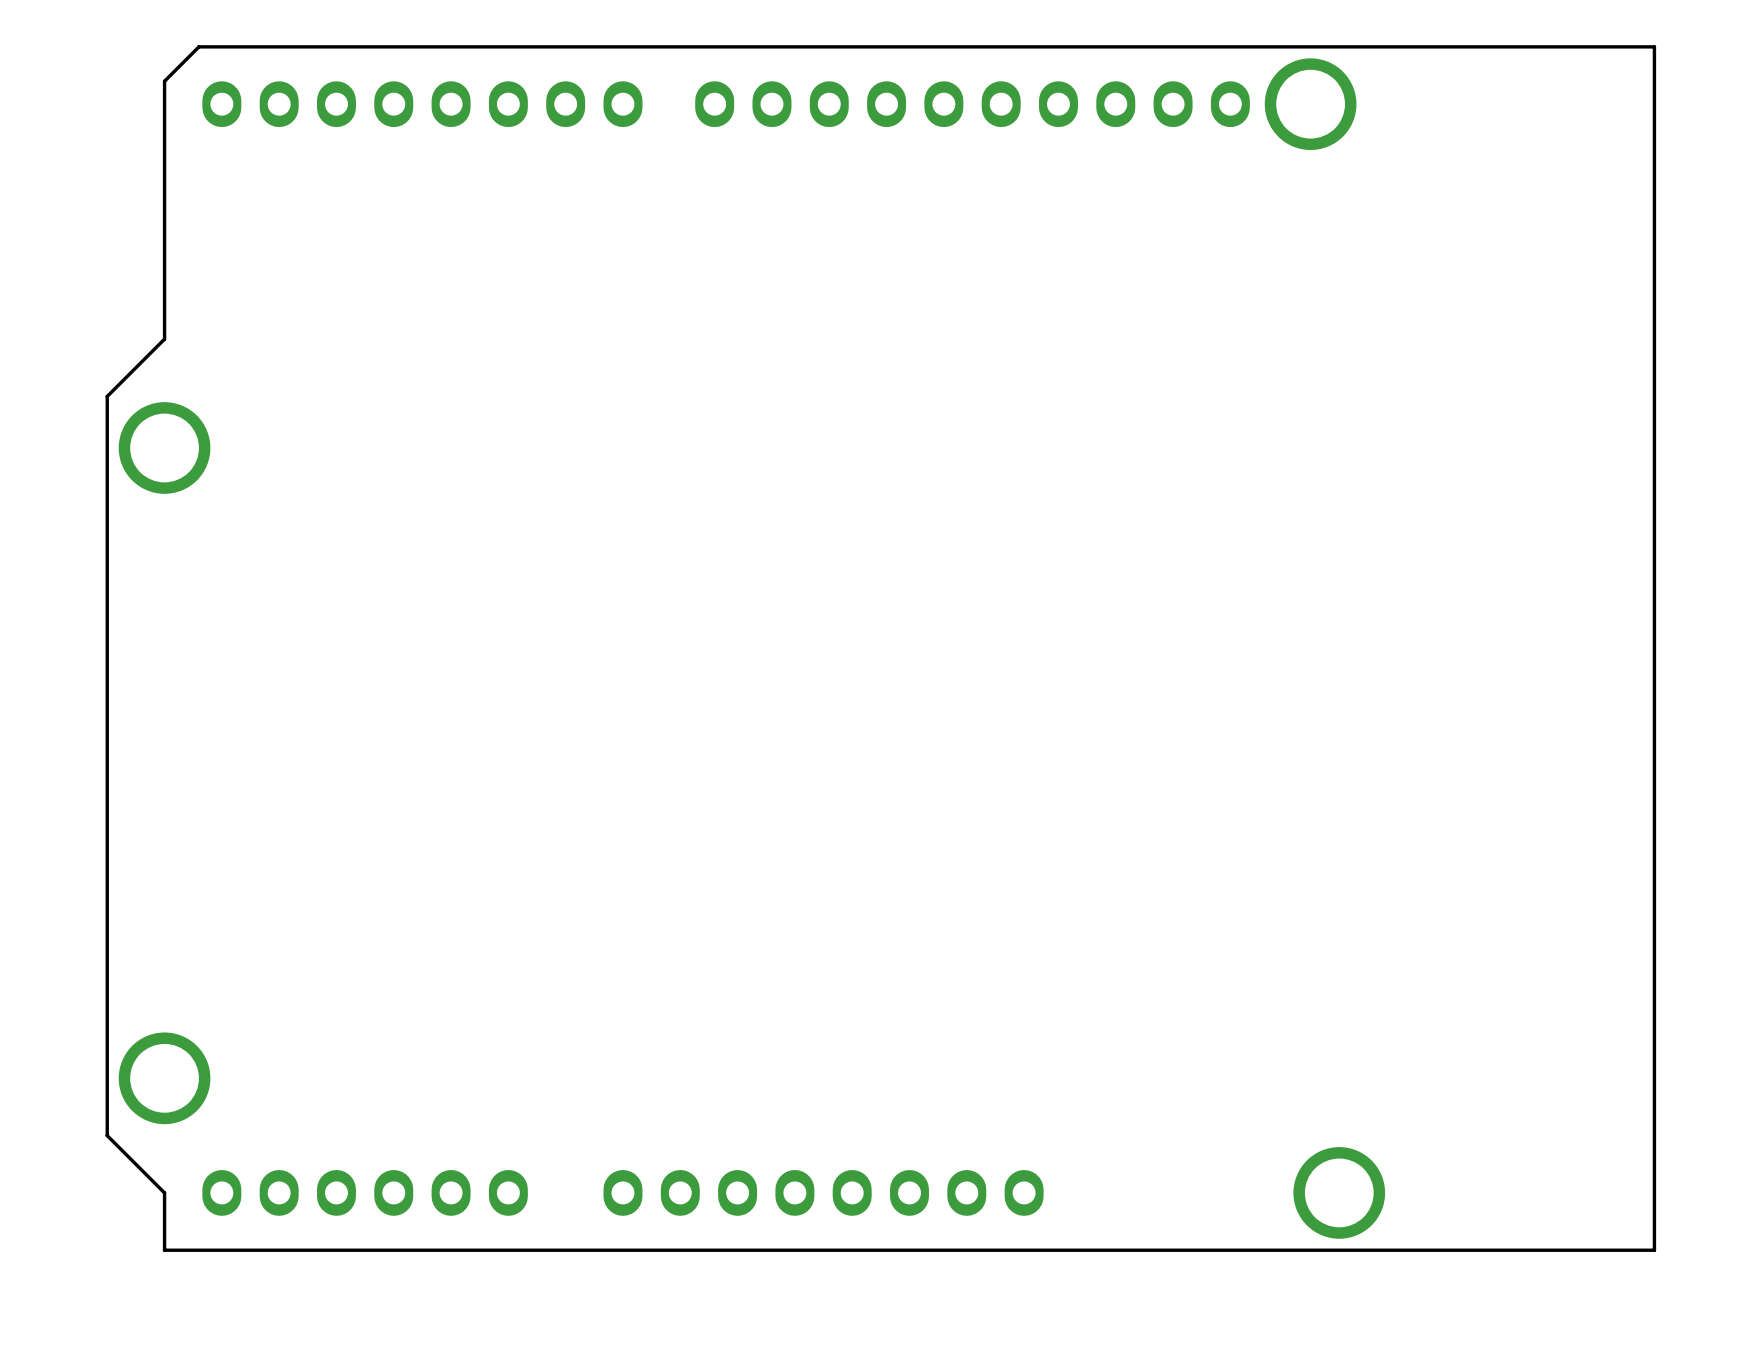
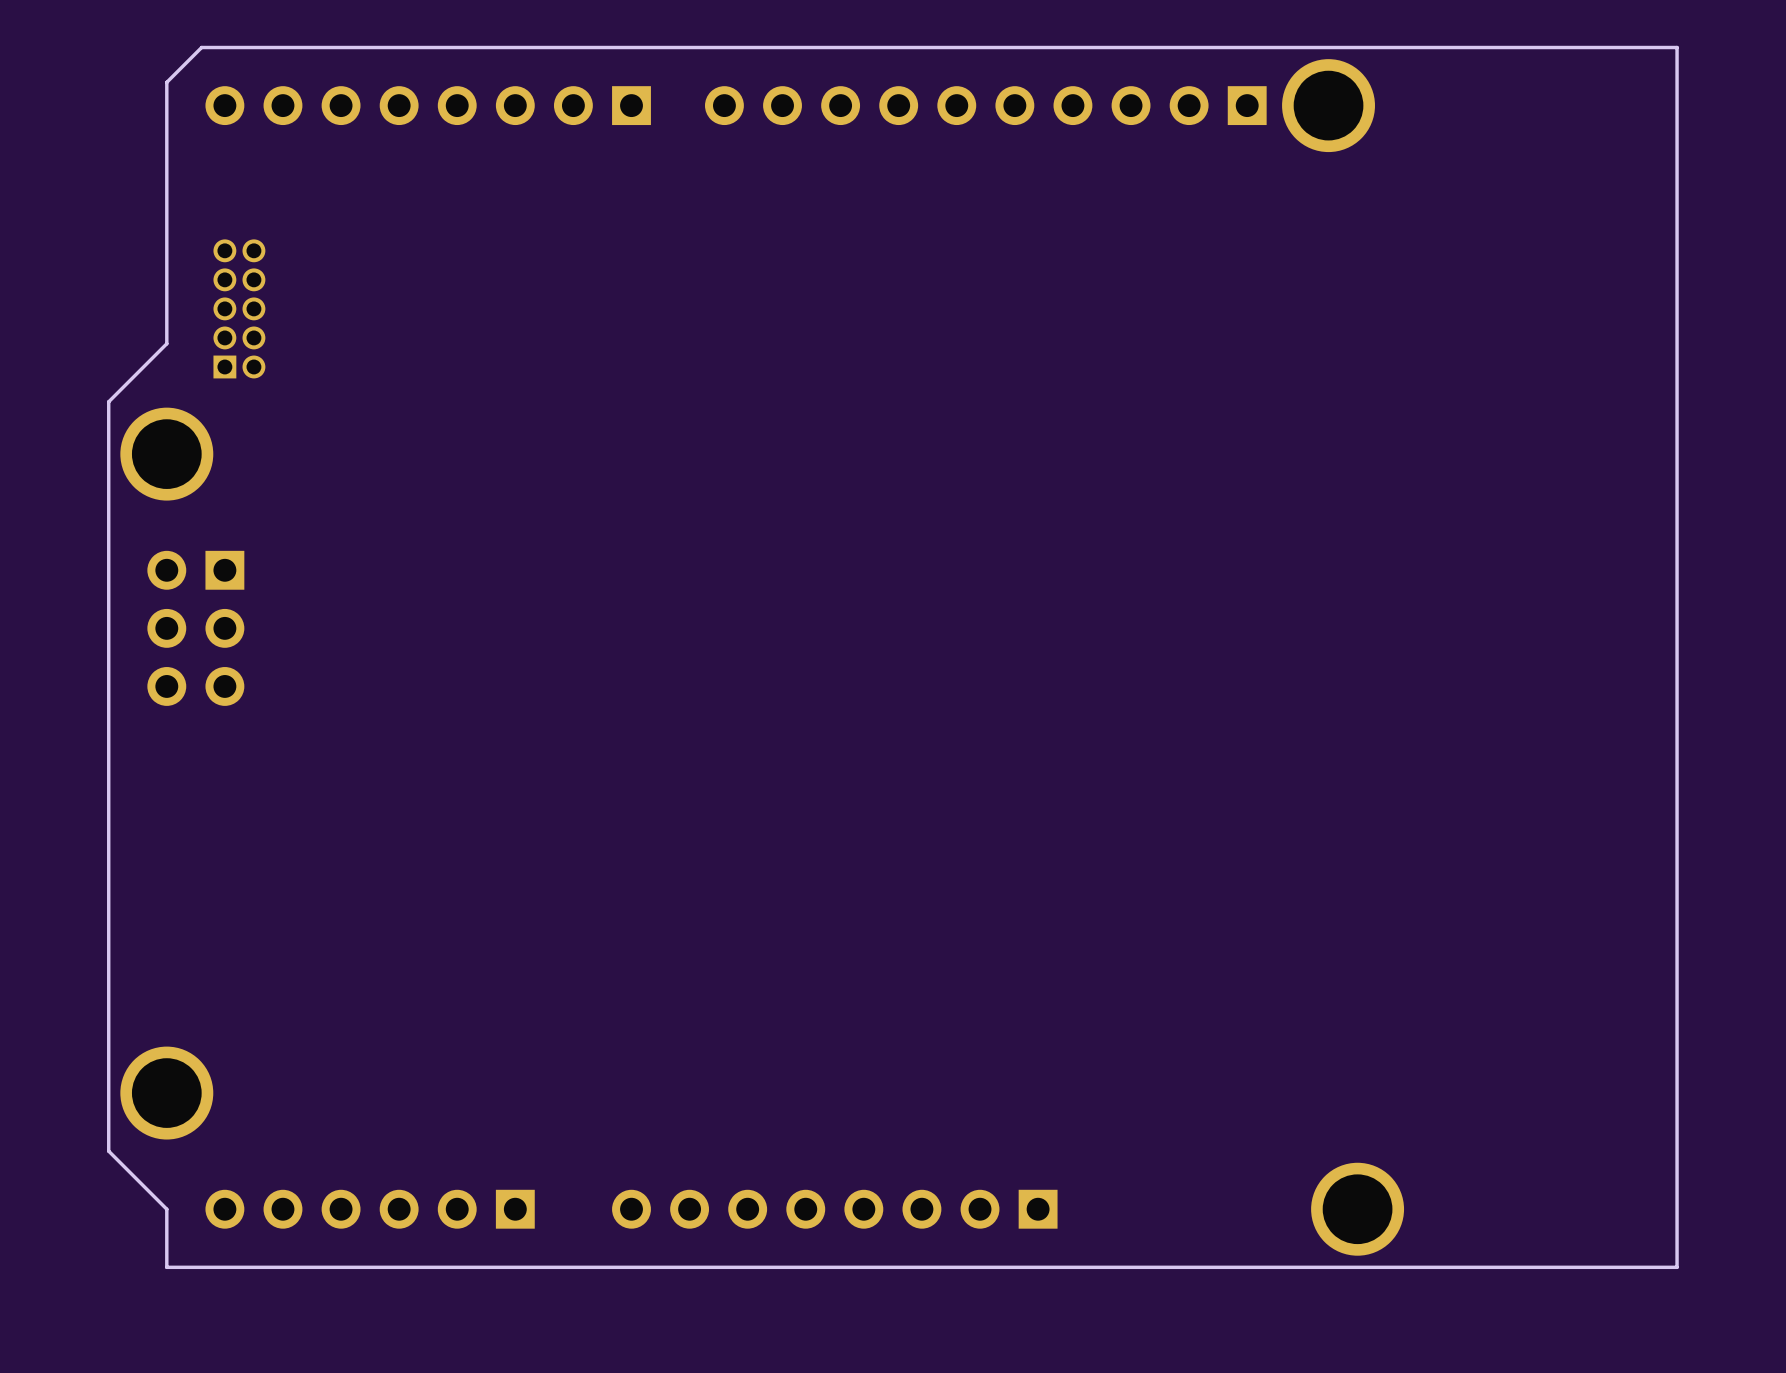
part footprint: [202, 81, 643, 128] -> [205, 86, 651, 126]
part footprint: [695, 81, 1250, 128] -> [704, 86, 1267, 126]
part: none -> (239, 308)
part: none -> (195, 628)
part footprint: [202, 1170, 528, 1216] -> [205, 1189, 535, 1229]
part footprint: [603, 1170, 1044, 1216] -> [612, 1189, 1058, 1229]

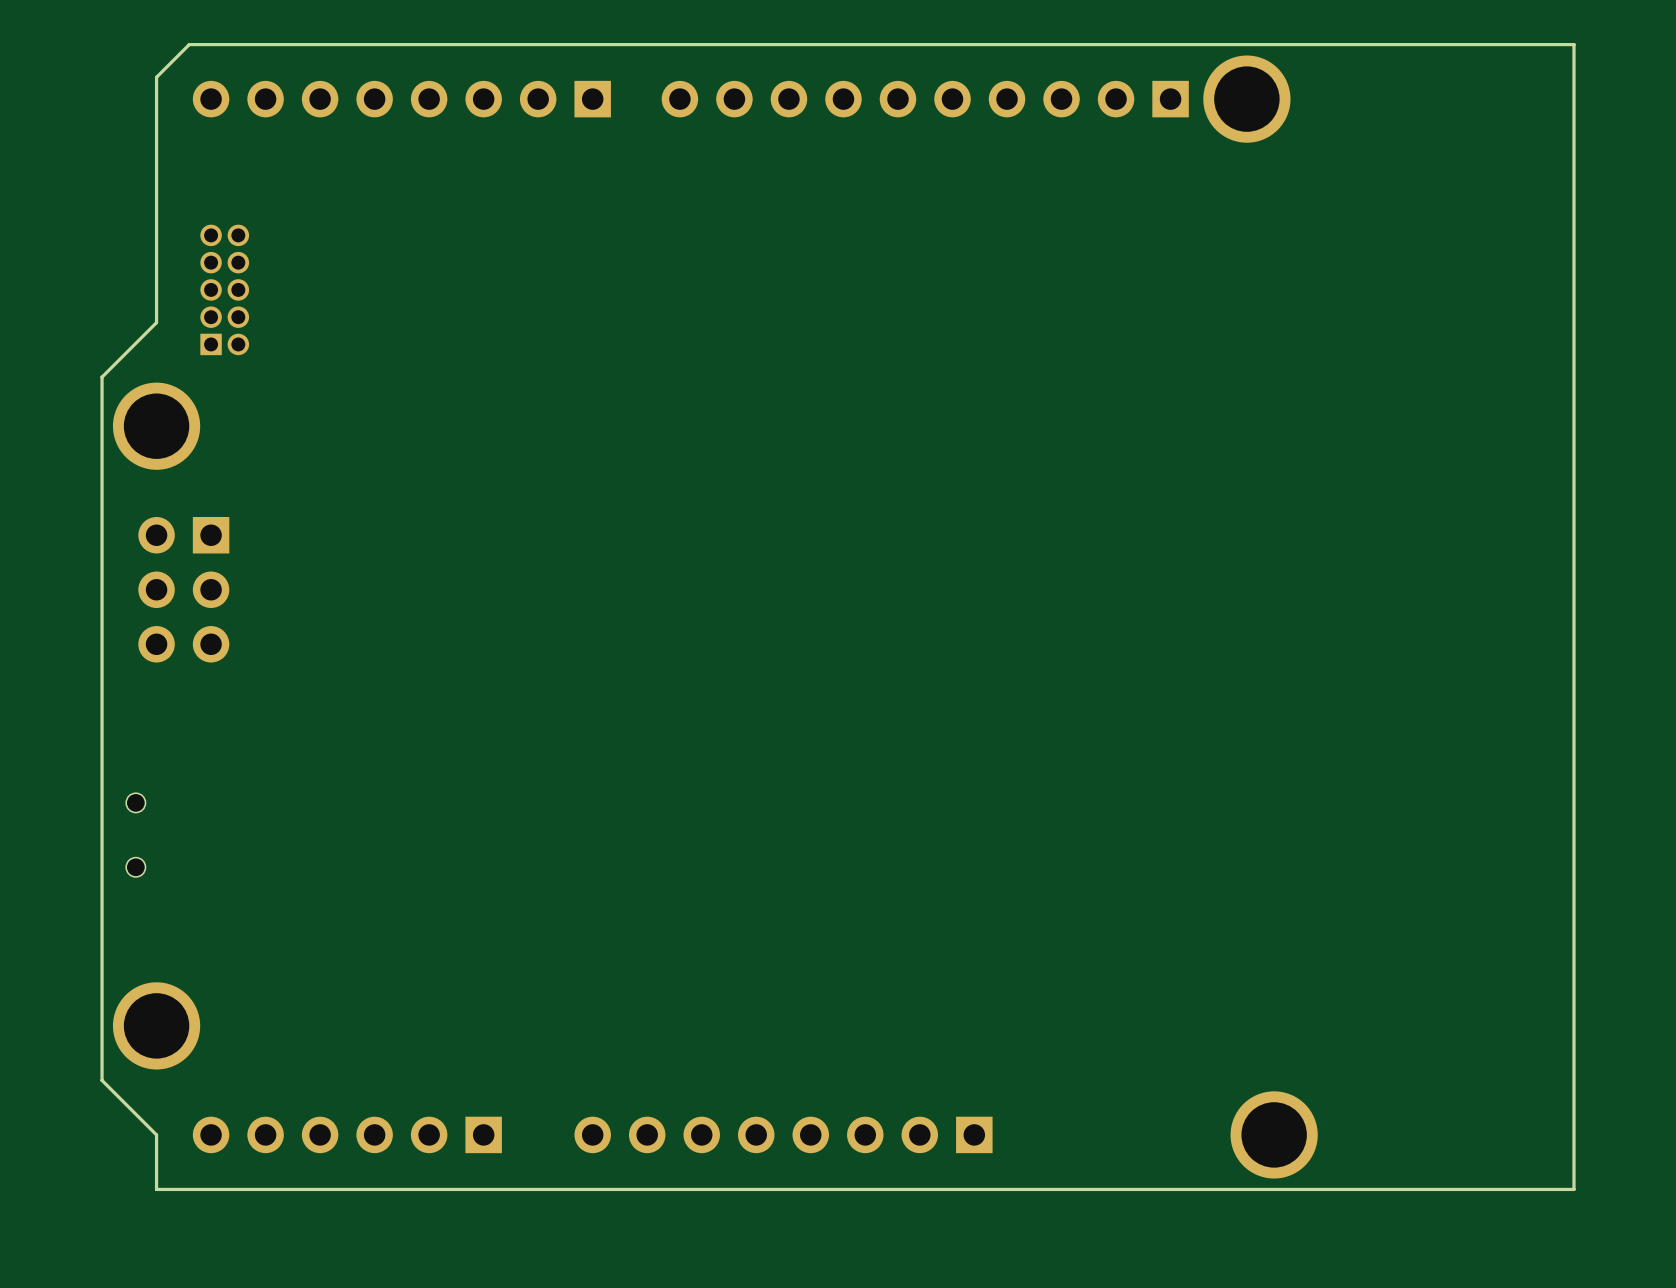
part: none -> (135, 835)

